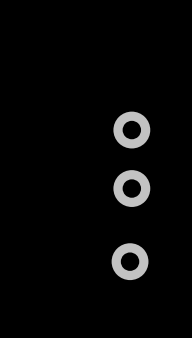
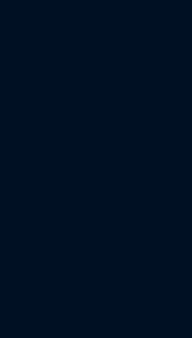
via: (131, 130) -> none
via: (131, 188) -> none
via: (130, 261) -> none

